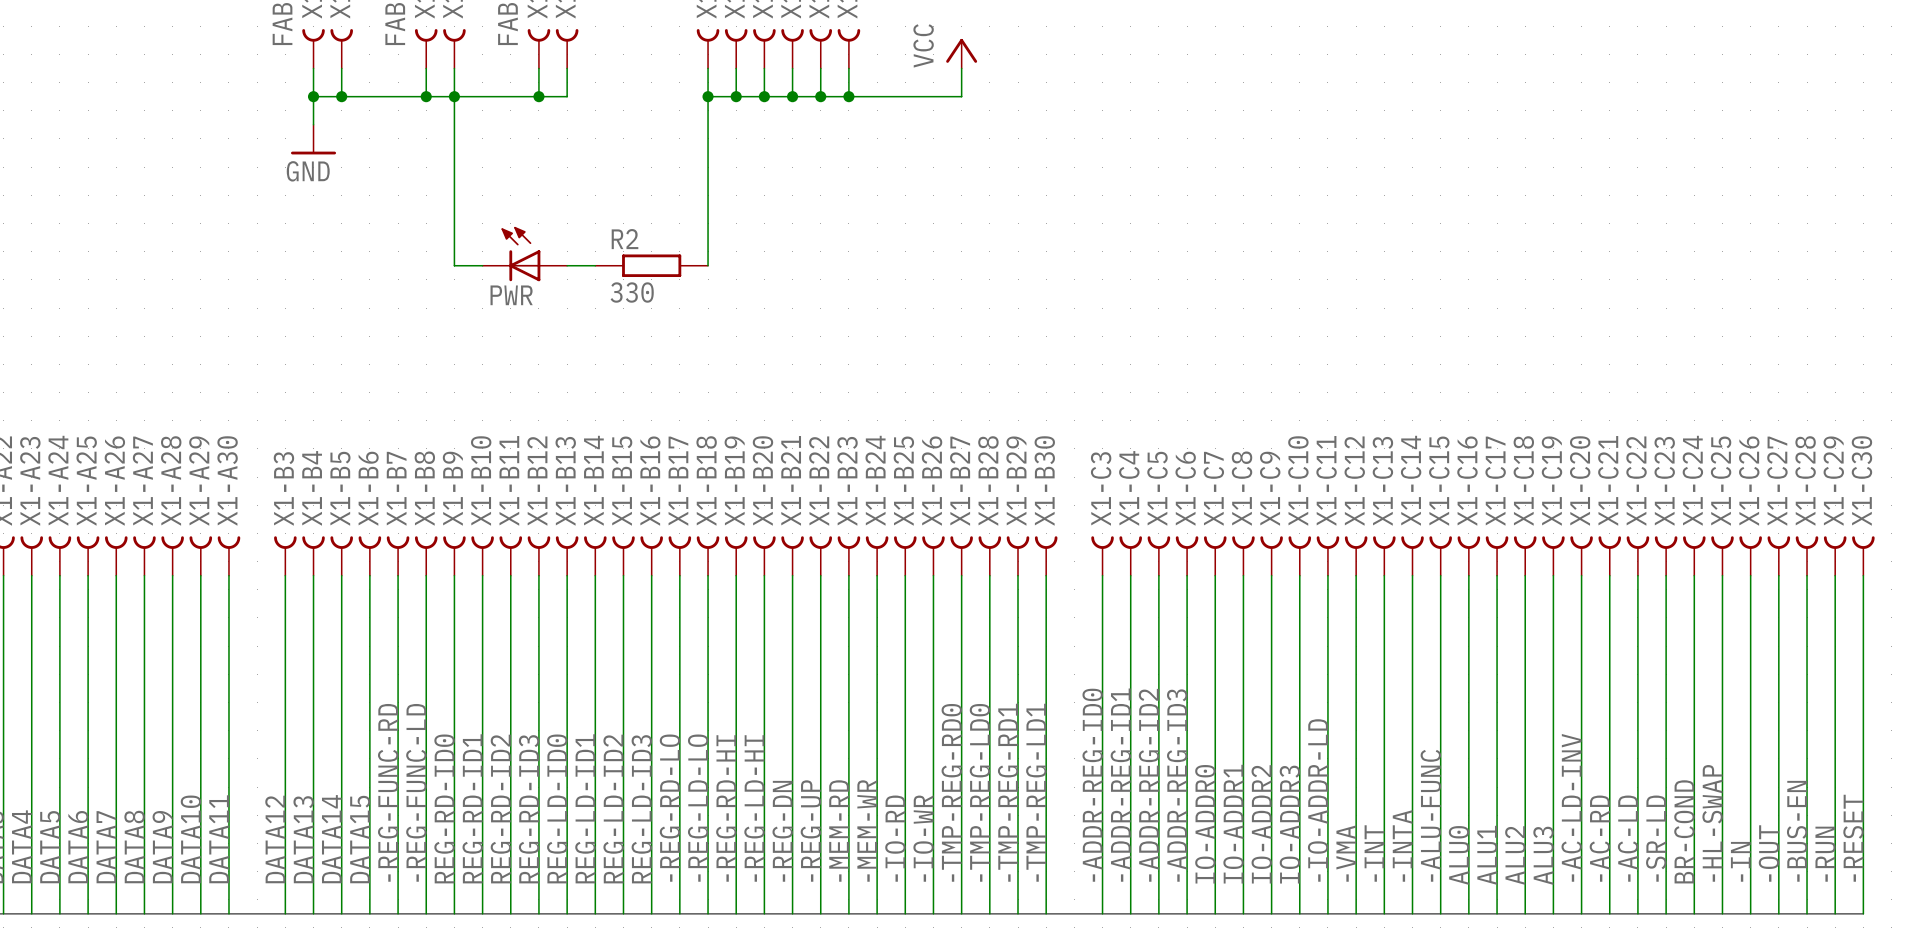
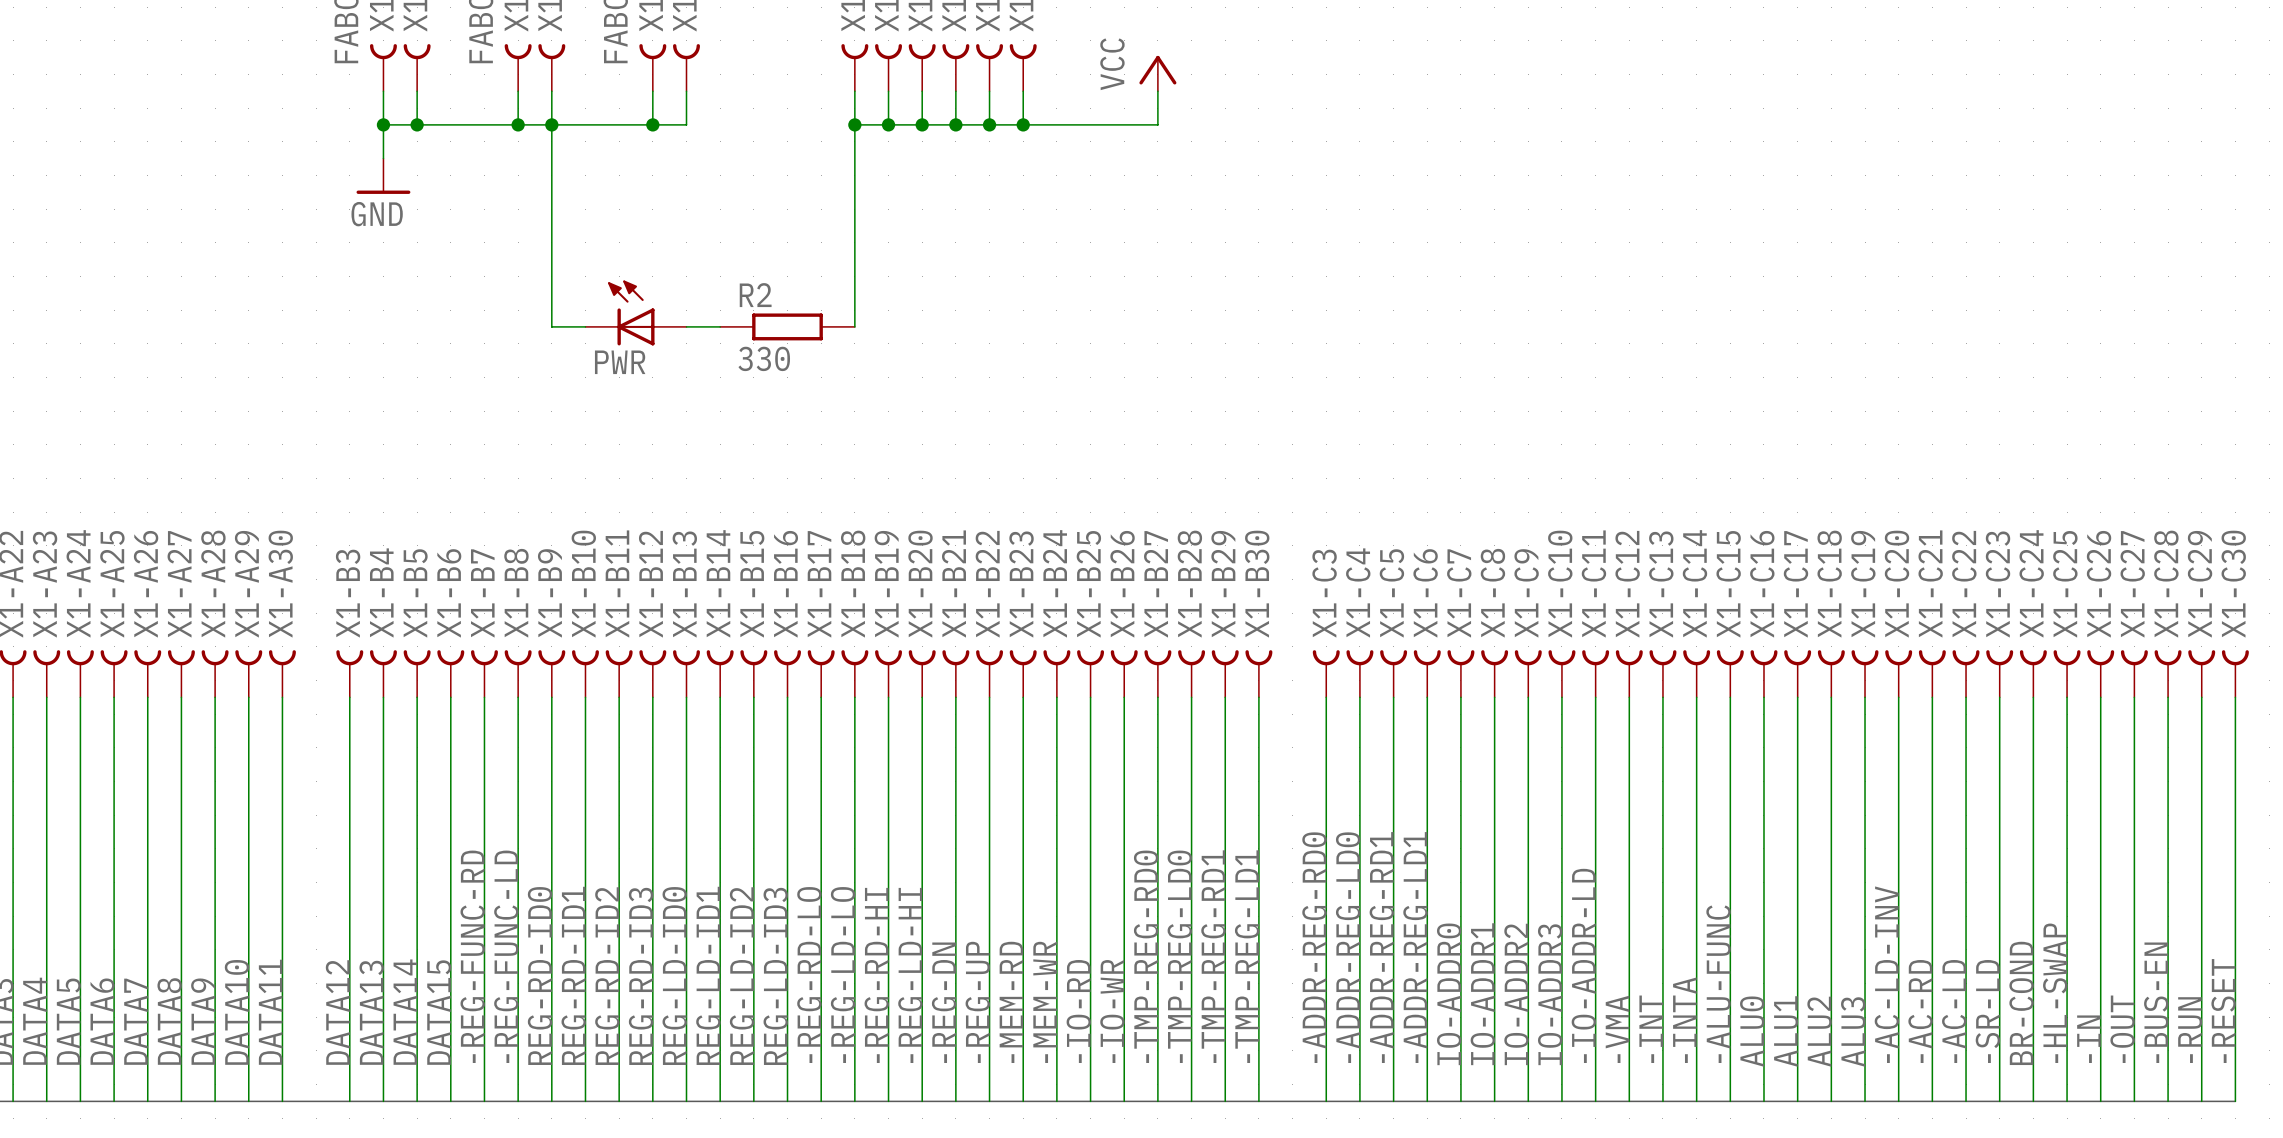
label: -ADDR-REG-ID0 (1092, 785) -> -ADDR-REG-RD0 (1314, 947)
label: -ADDR-REG-ID1 (1120, 785) -> -ADDR-REG-LD0 (1348, 947)
label: -ADDR-REG-ID2 (1149, 785) -> -ADDR-REG-RD1 (1381, 947)
label: -ADDR-REG-ID3 (1177, 785) -> -ADDR-REG-LD1 (1415, 947)

